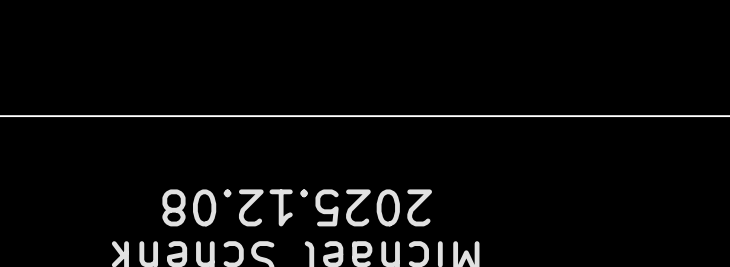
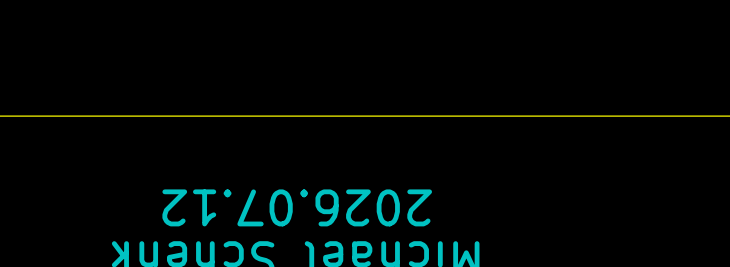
text: 2025.12.08 (297, 207) -> 2026.07.12 (297, 207)

